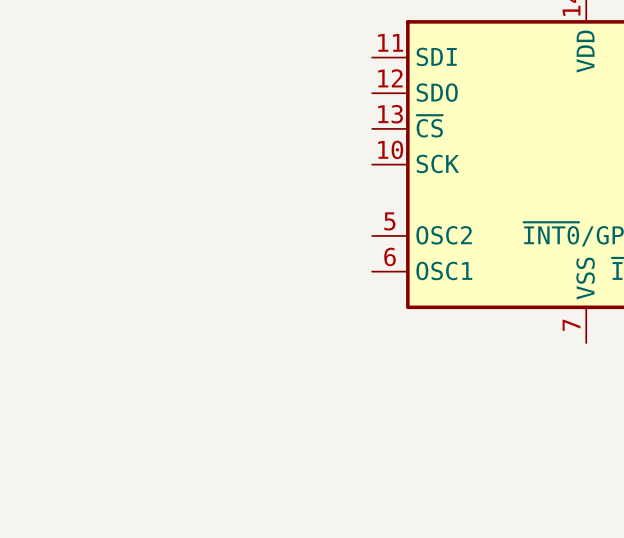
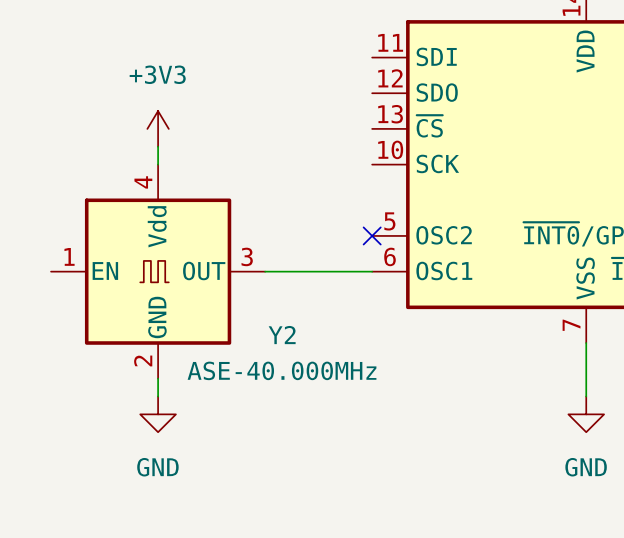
power symbol: none -> +3V3 (158, 128)
wire: none -> (158, 146) (158, 164)
no-connect mark: none -> (372, 235)
Y2: none -> ASE-40.000MHz (158, 271)
wire: none -> (265, 271) (372, 271)
wire: none -> (586, 343) (586, 396)
wire: none -> (158, 378) (158, 396)
power symbol: none -> GND (158, 414)
power symbol: none -> GND (586, 414)

